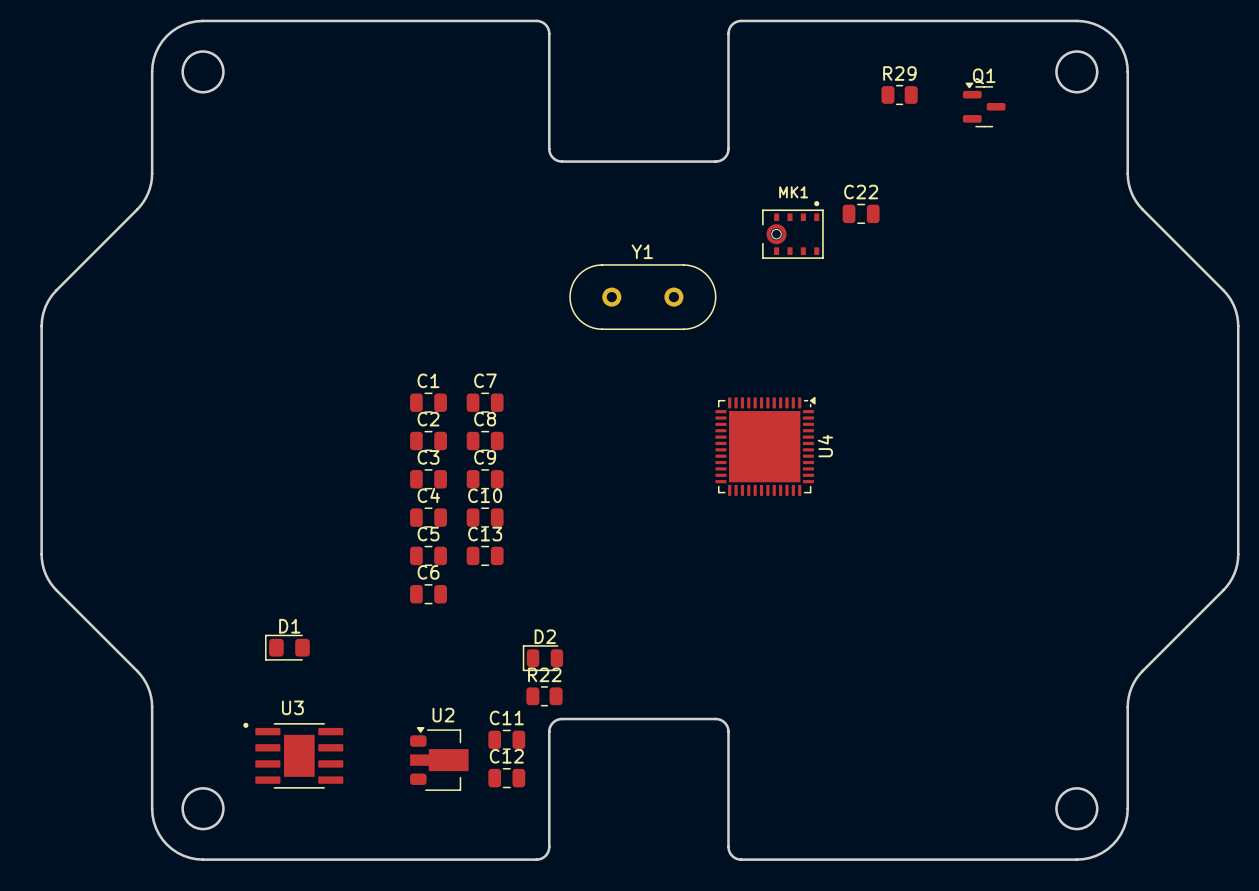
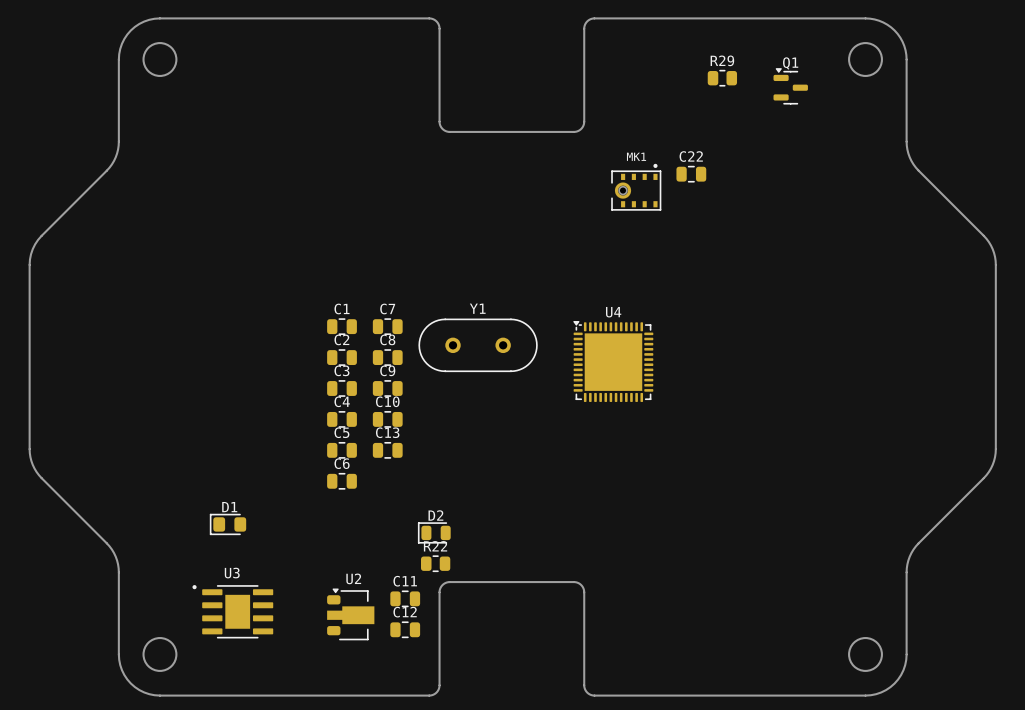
Y1 position: (642, 297) -> (478, 345)
U4 rotation: 0° (765, 446) -> 90° counterclockwise (613, 361)

